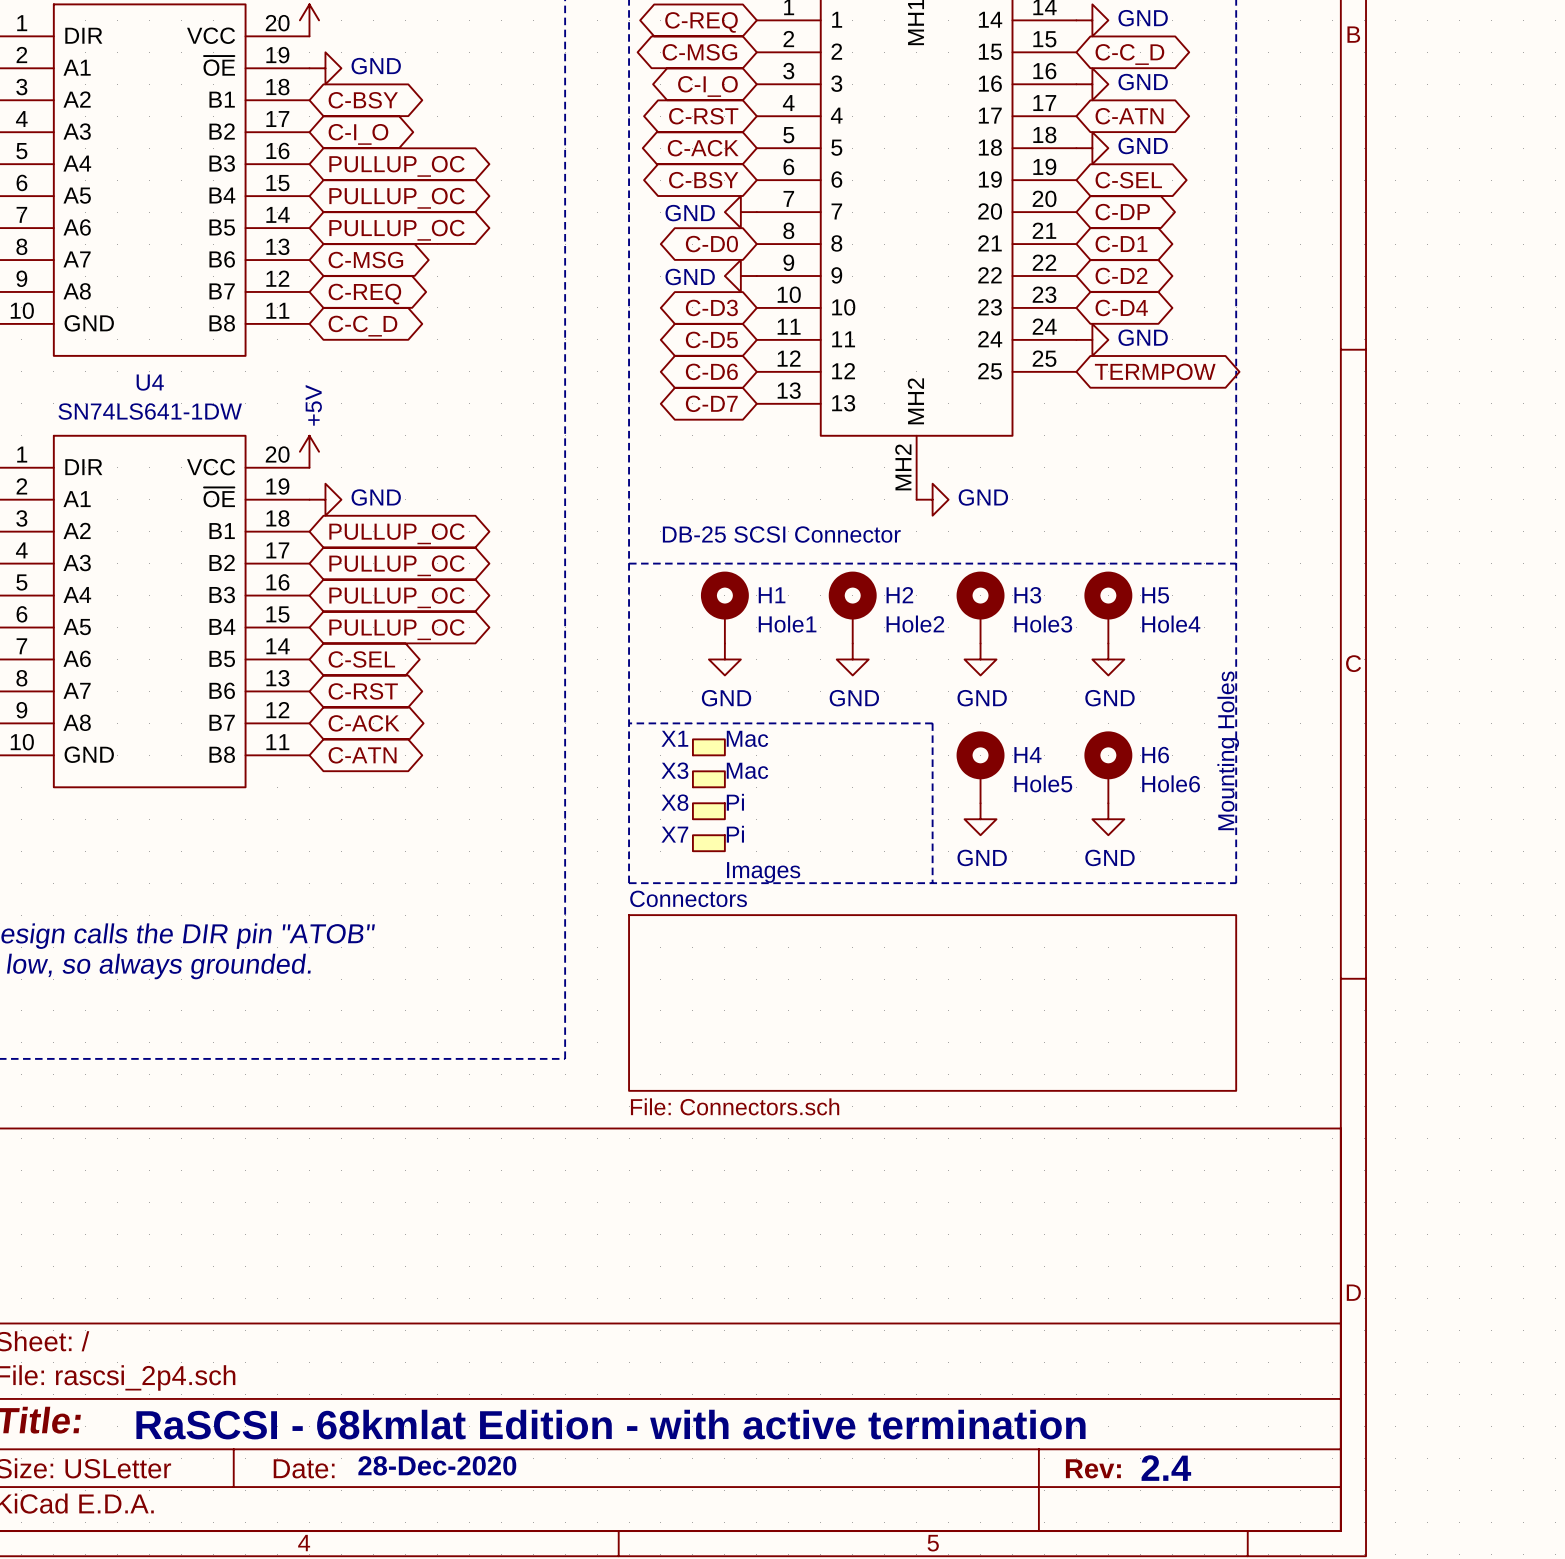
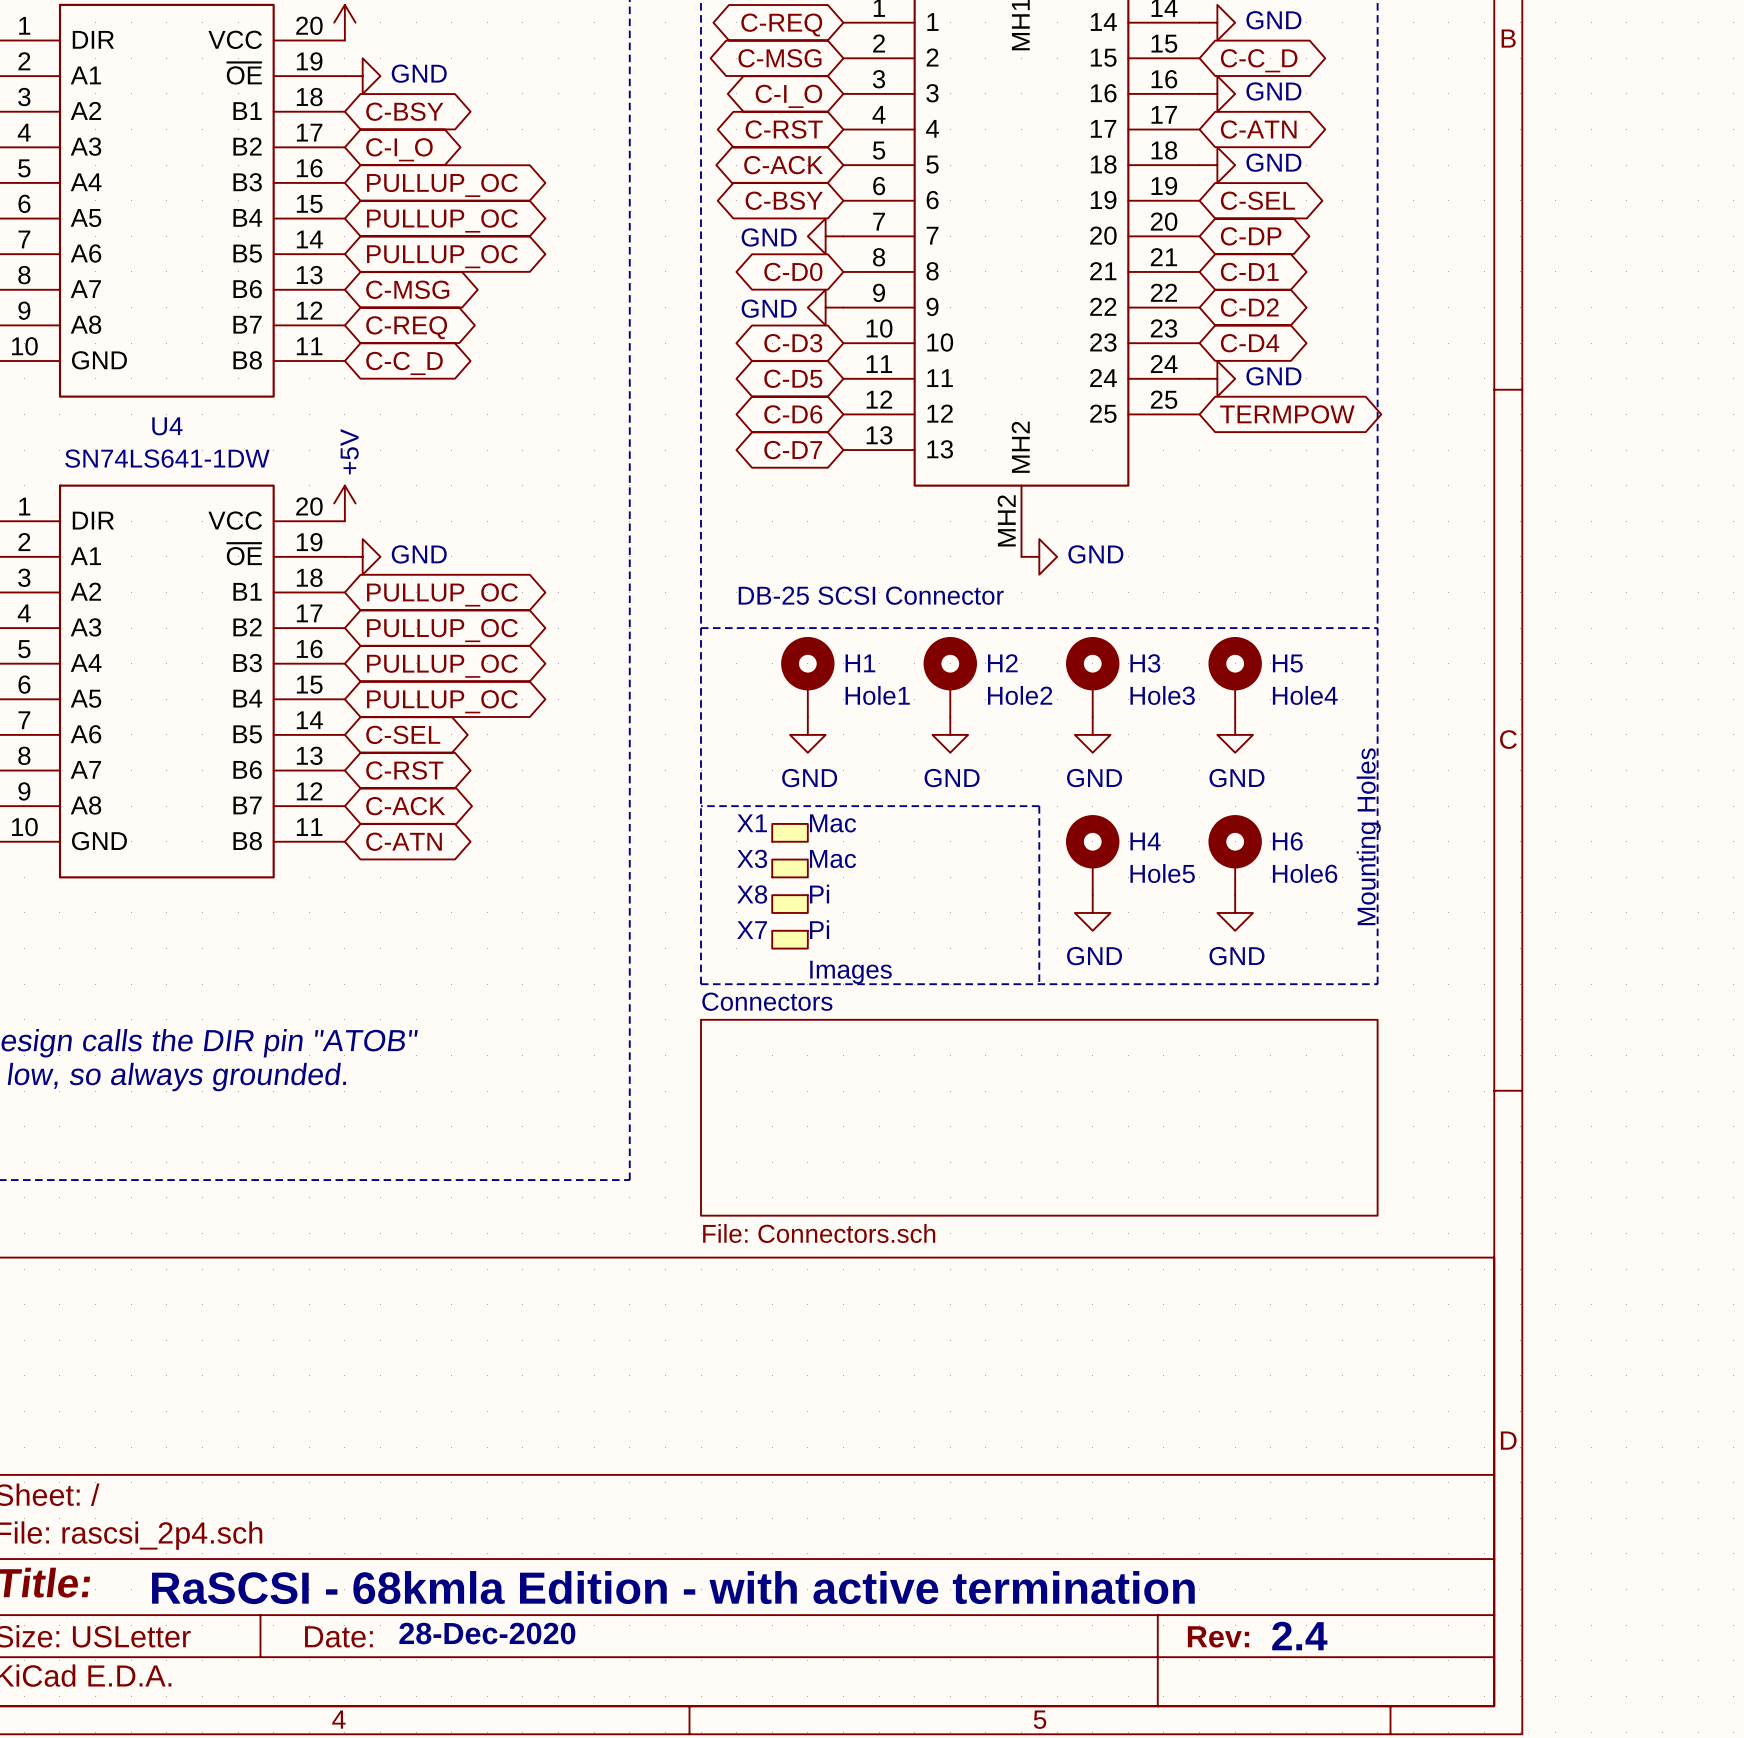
text: RaSCSI - 68kmlat Edition - with active termination (610, 1424) -> RaSCSI - 68kmla Edition - with active termination (673, 1587)

